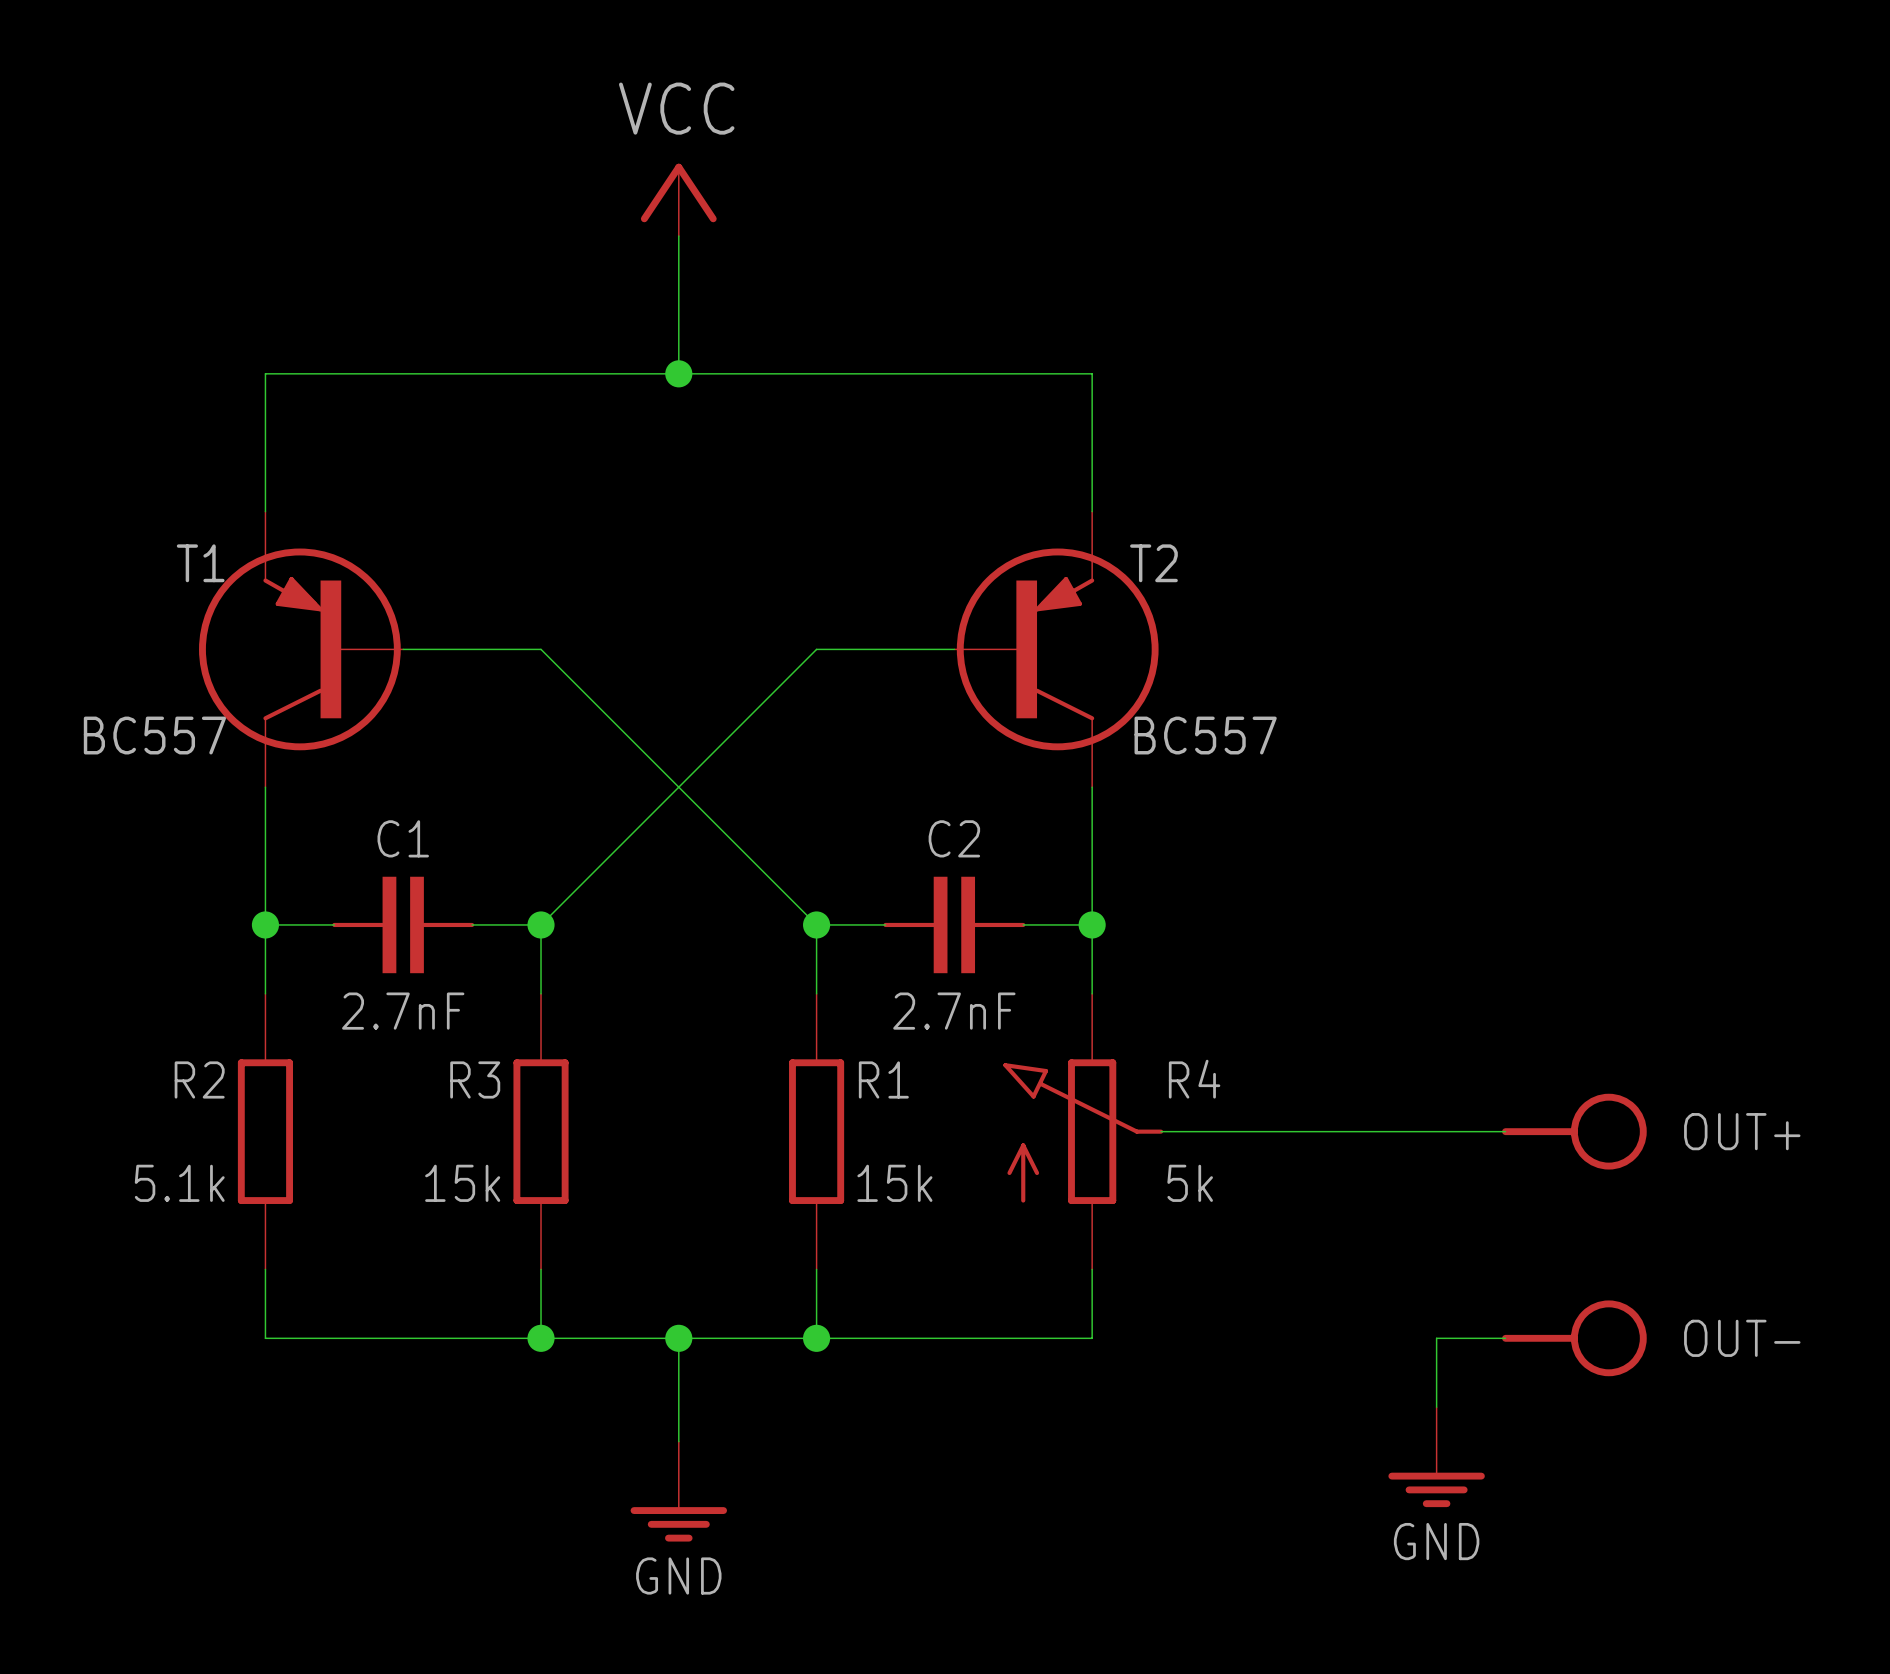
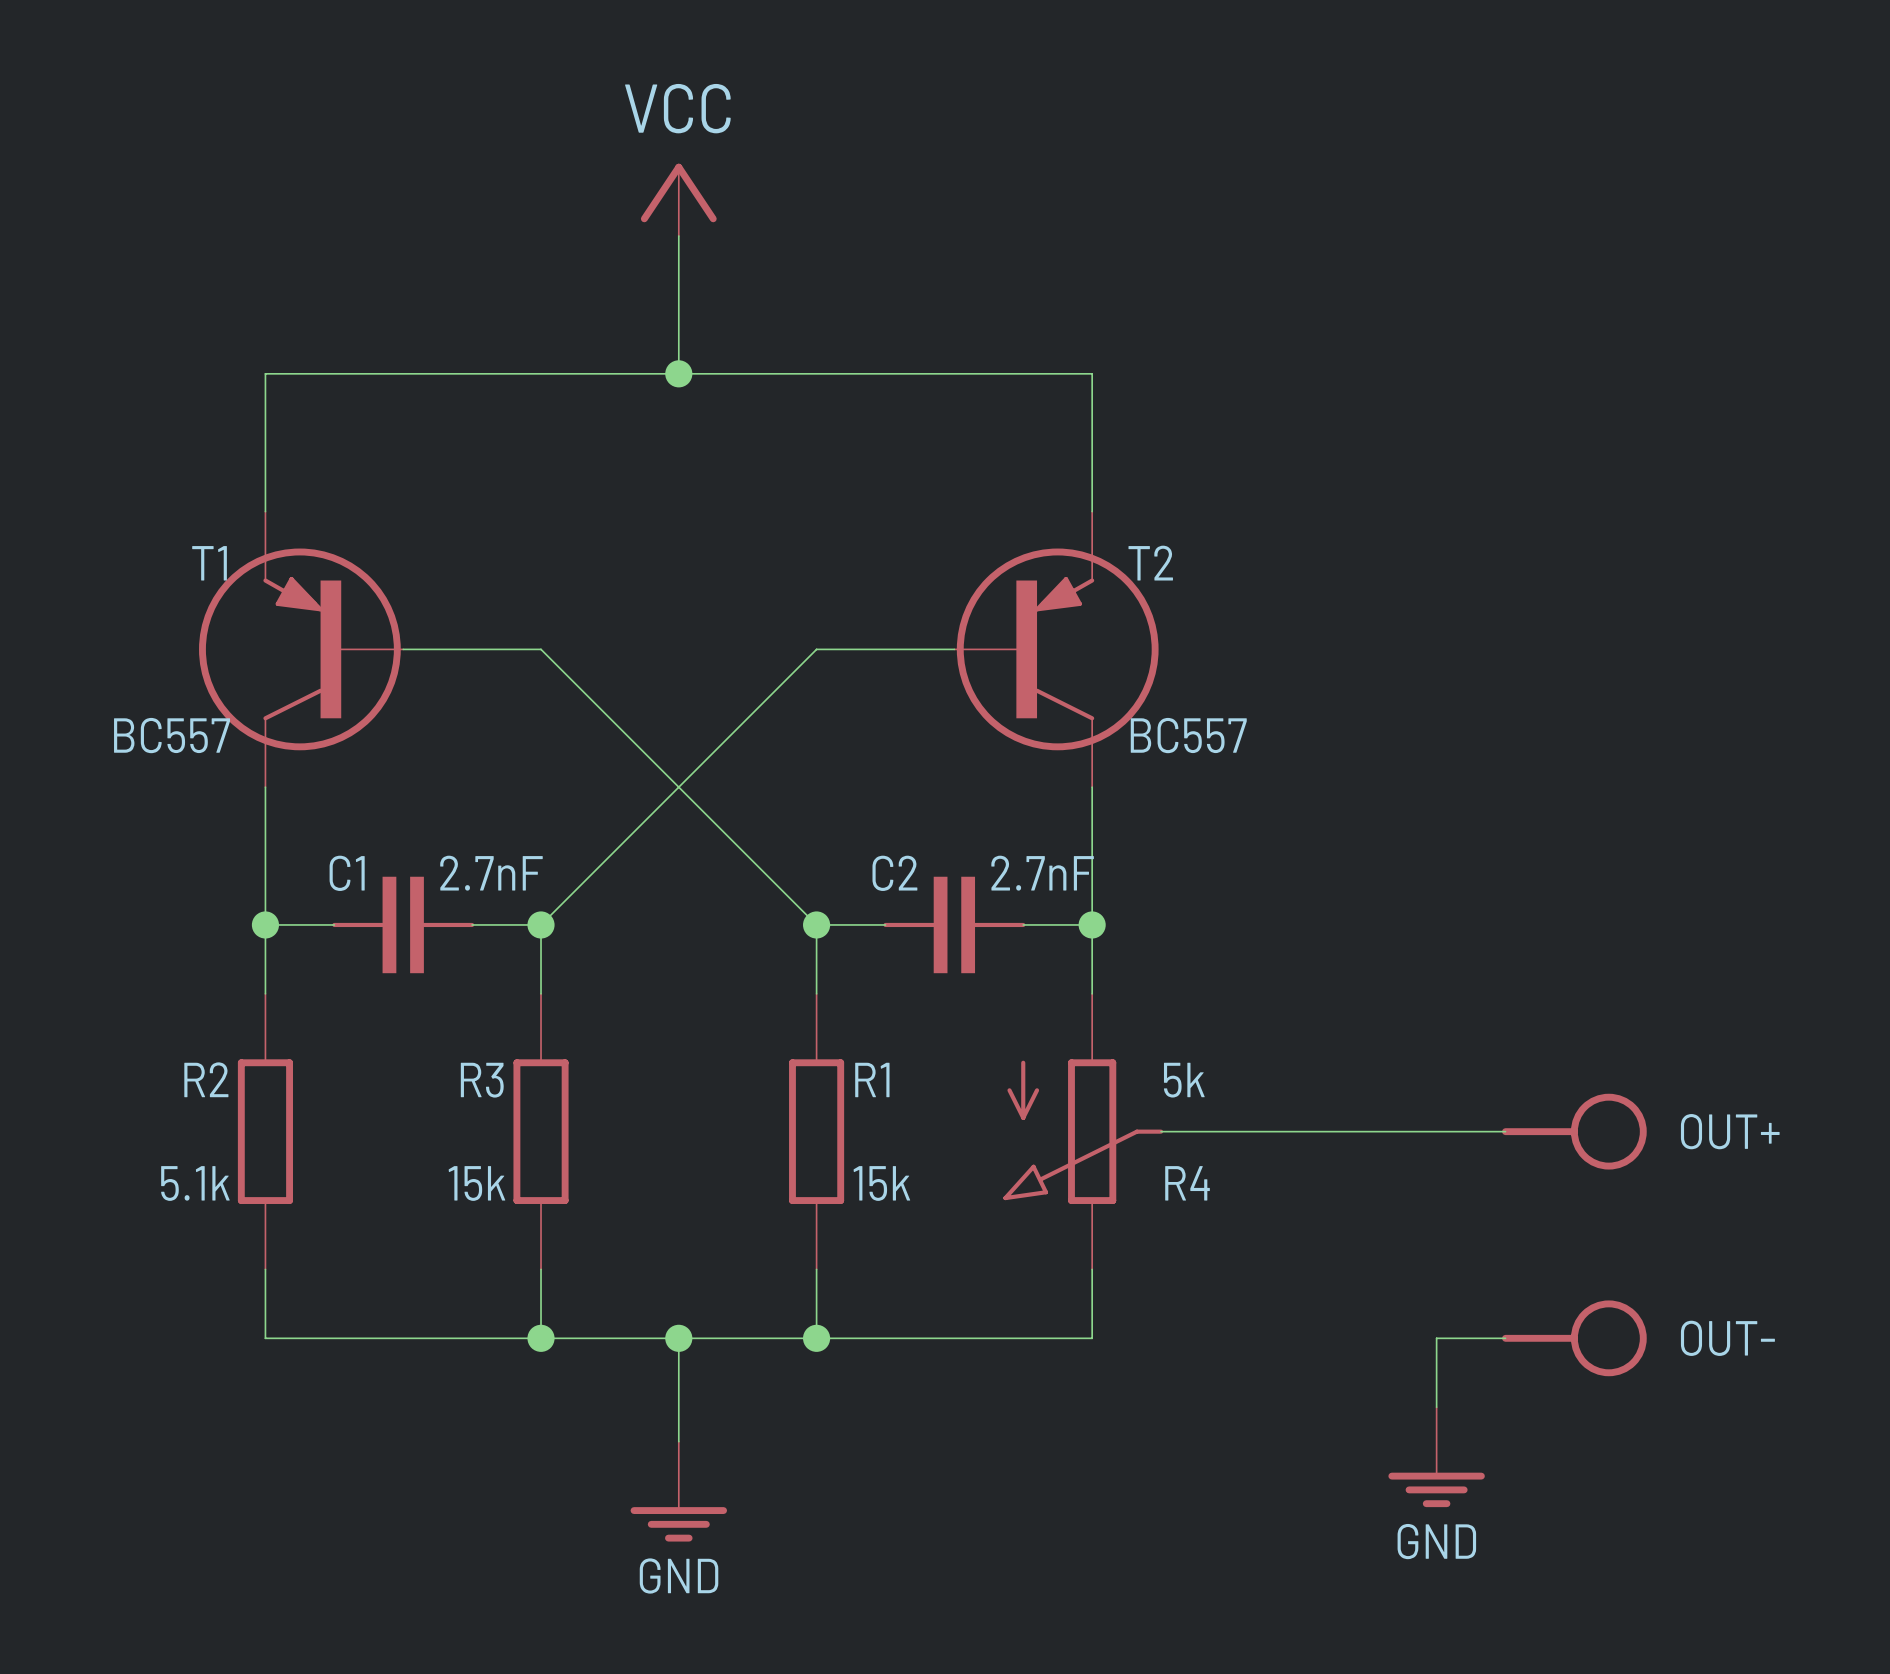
C1 name position: C1 (403, 838) -> C1 (347, 873)
C2 name position: C2 (954, 838) -> C2 (894, 873)
C1 value position: 2.7nF (403, 1011) -> 2.7nF (491, 873)
C2 value position: 2.7nF (954, 1011) -> 2.7nF (1042, 873)
R4 flip: as is (1083, 1131) -> up-down (1083, 1131)

